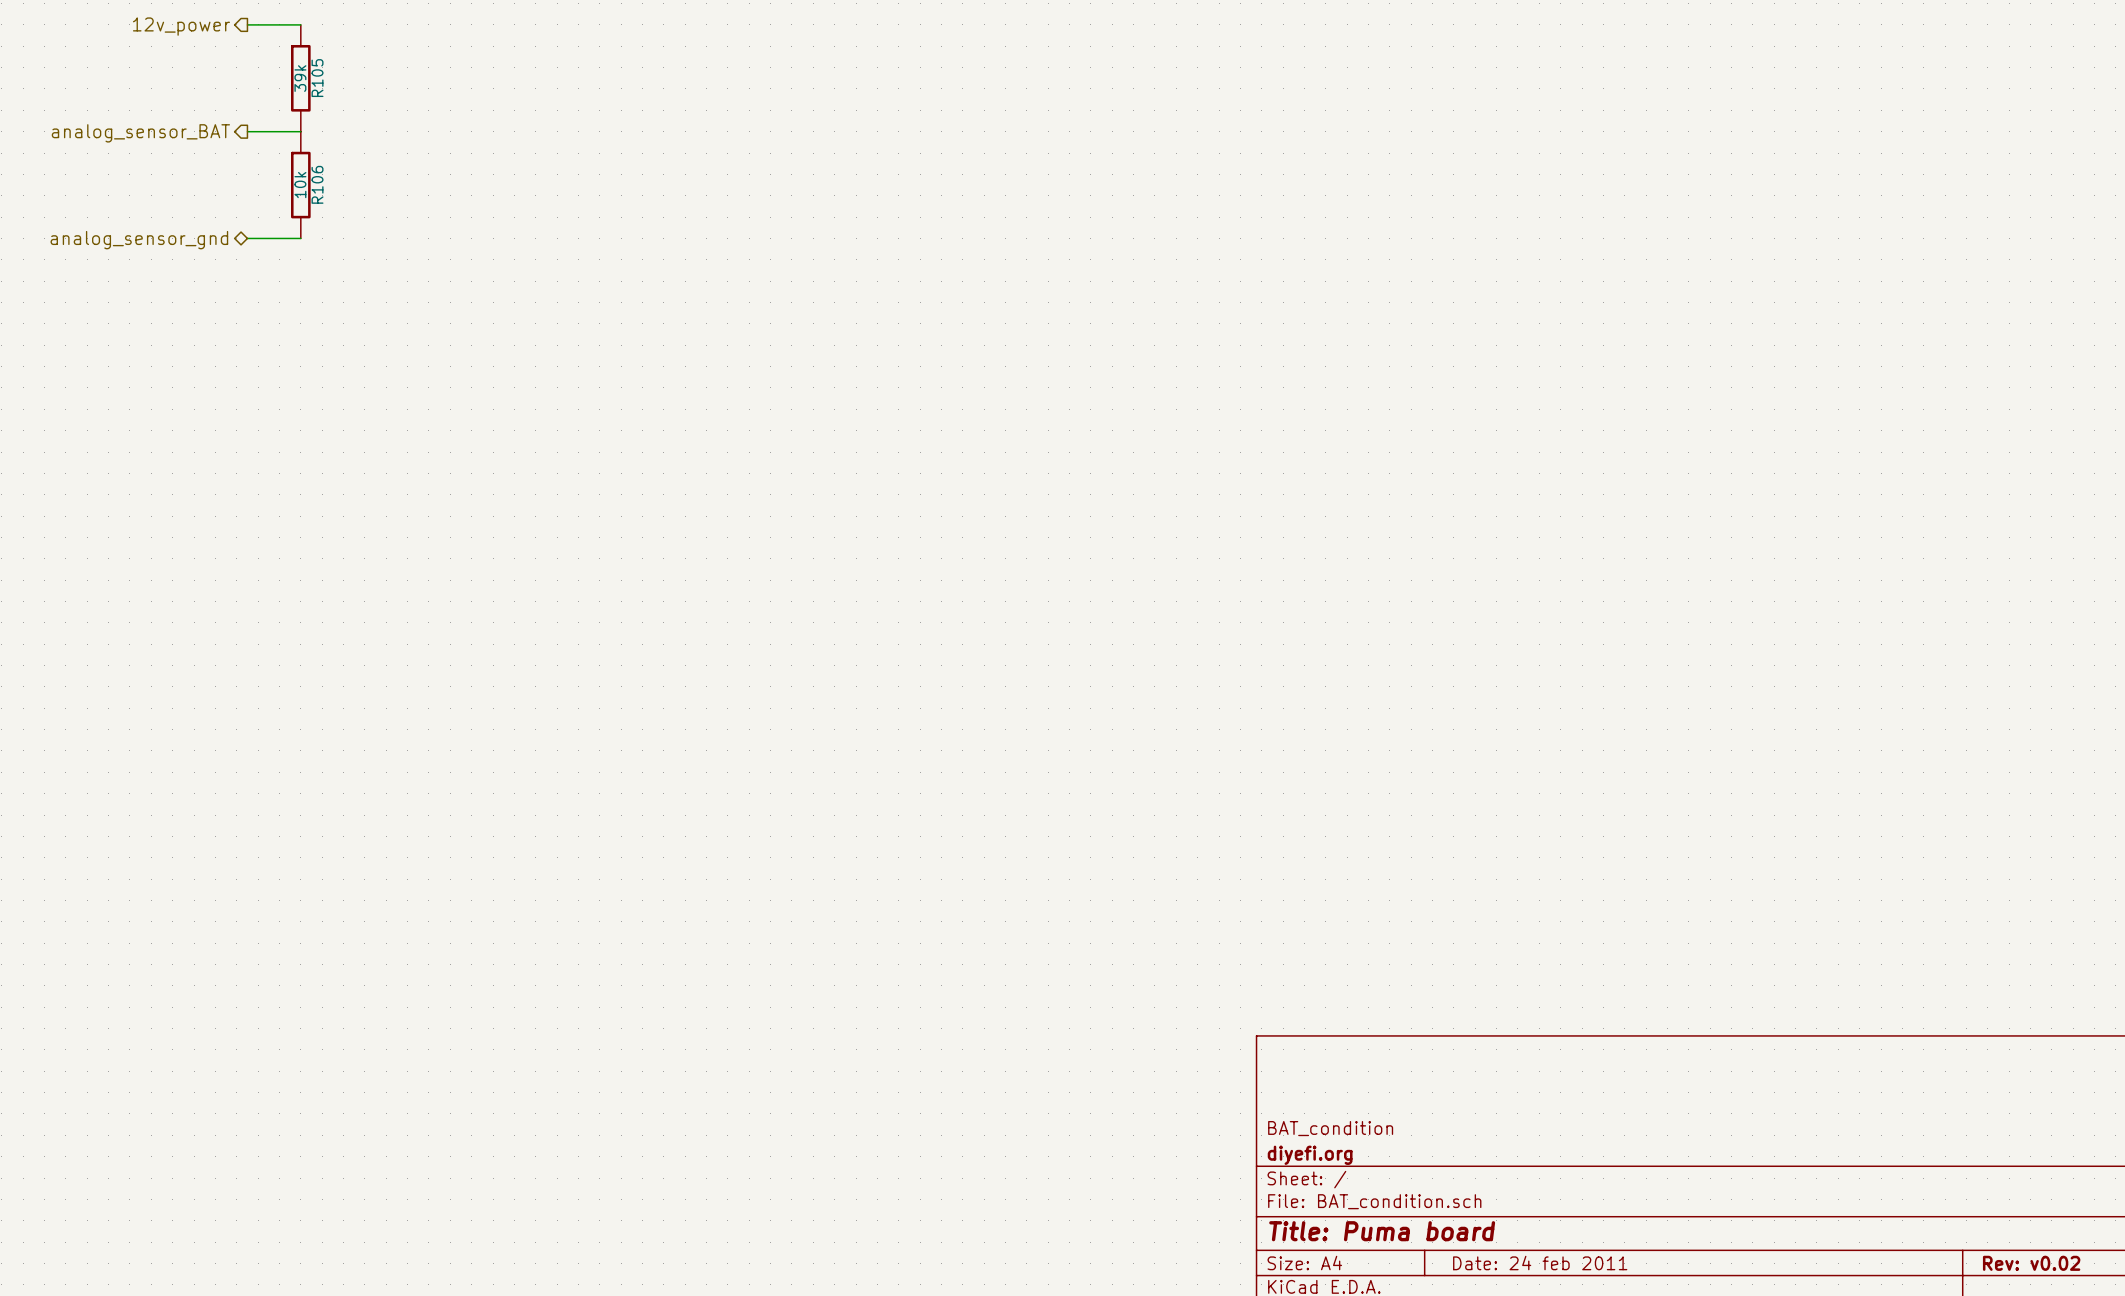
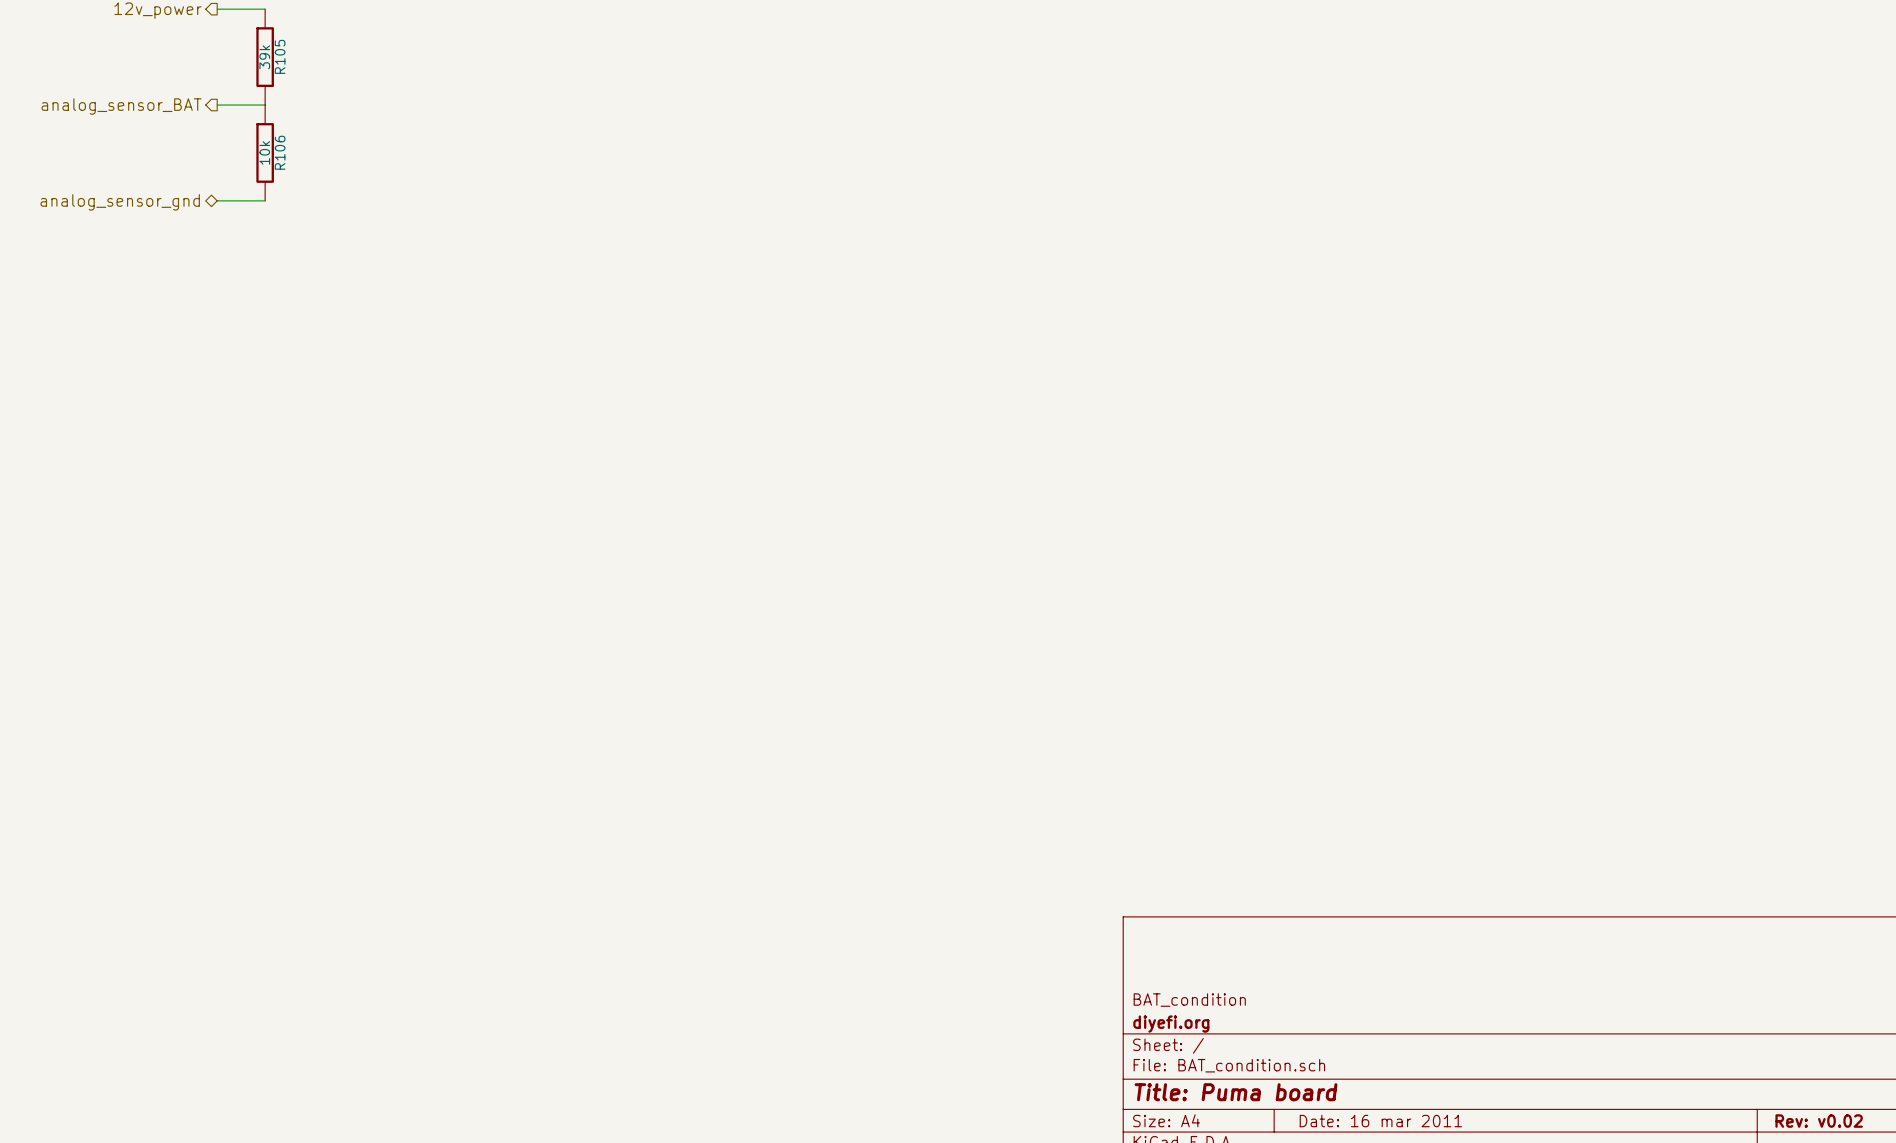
title block: Date: 24 feb 2011 (1540, 1263) -> Date: 16 mar 2011 (1380, 1121)

